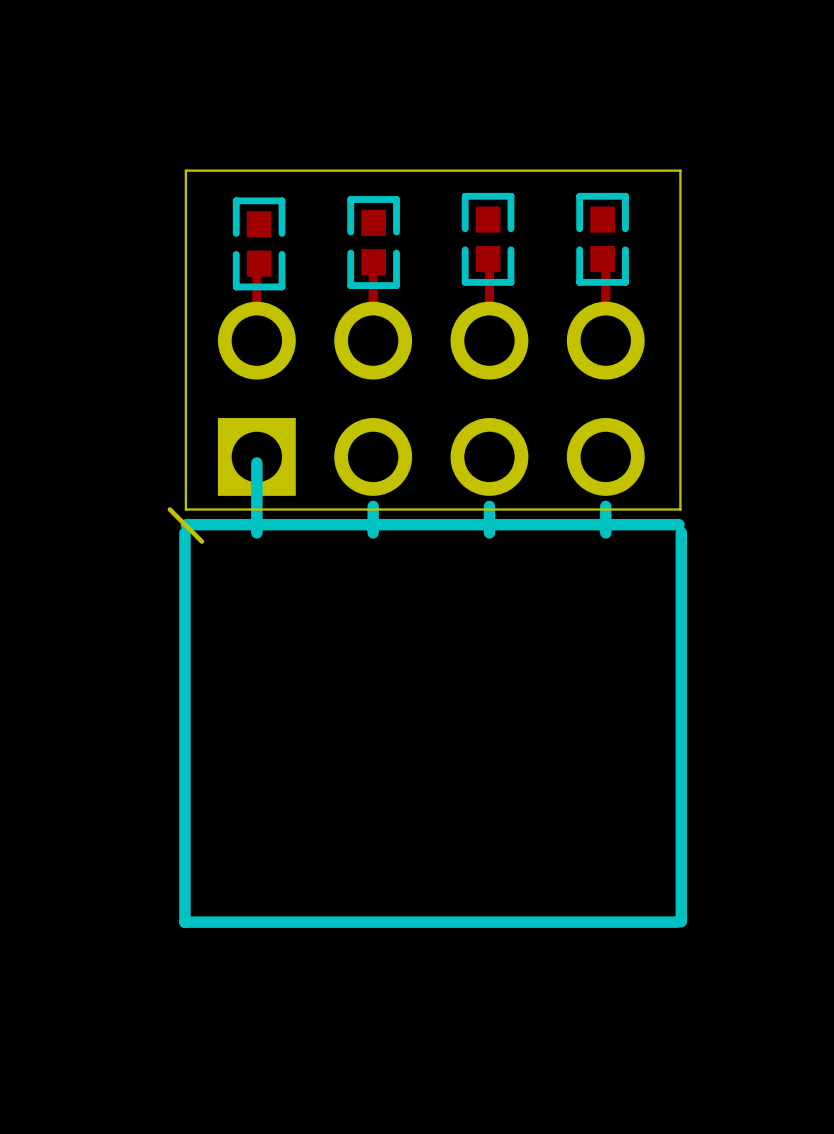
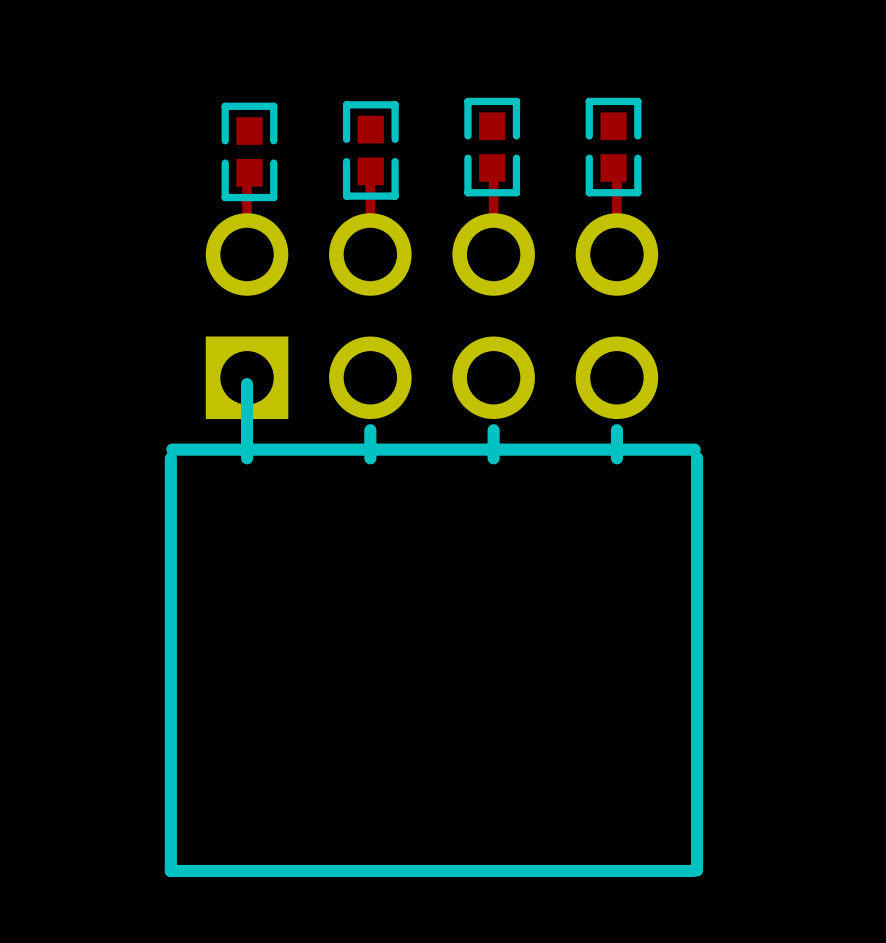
board edge: (185, 170) (680, 170) (680, 509) (185, 509) (185, 170) -> none
board edge: (169, 509) (201, 541) -> none

